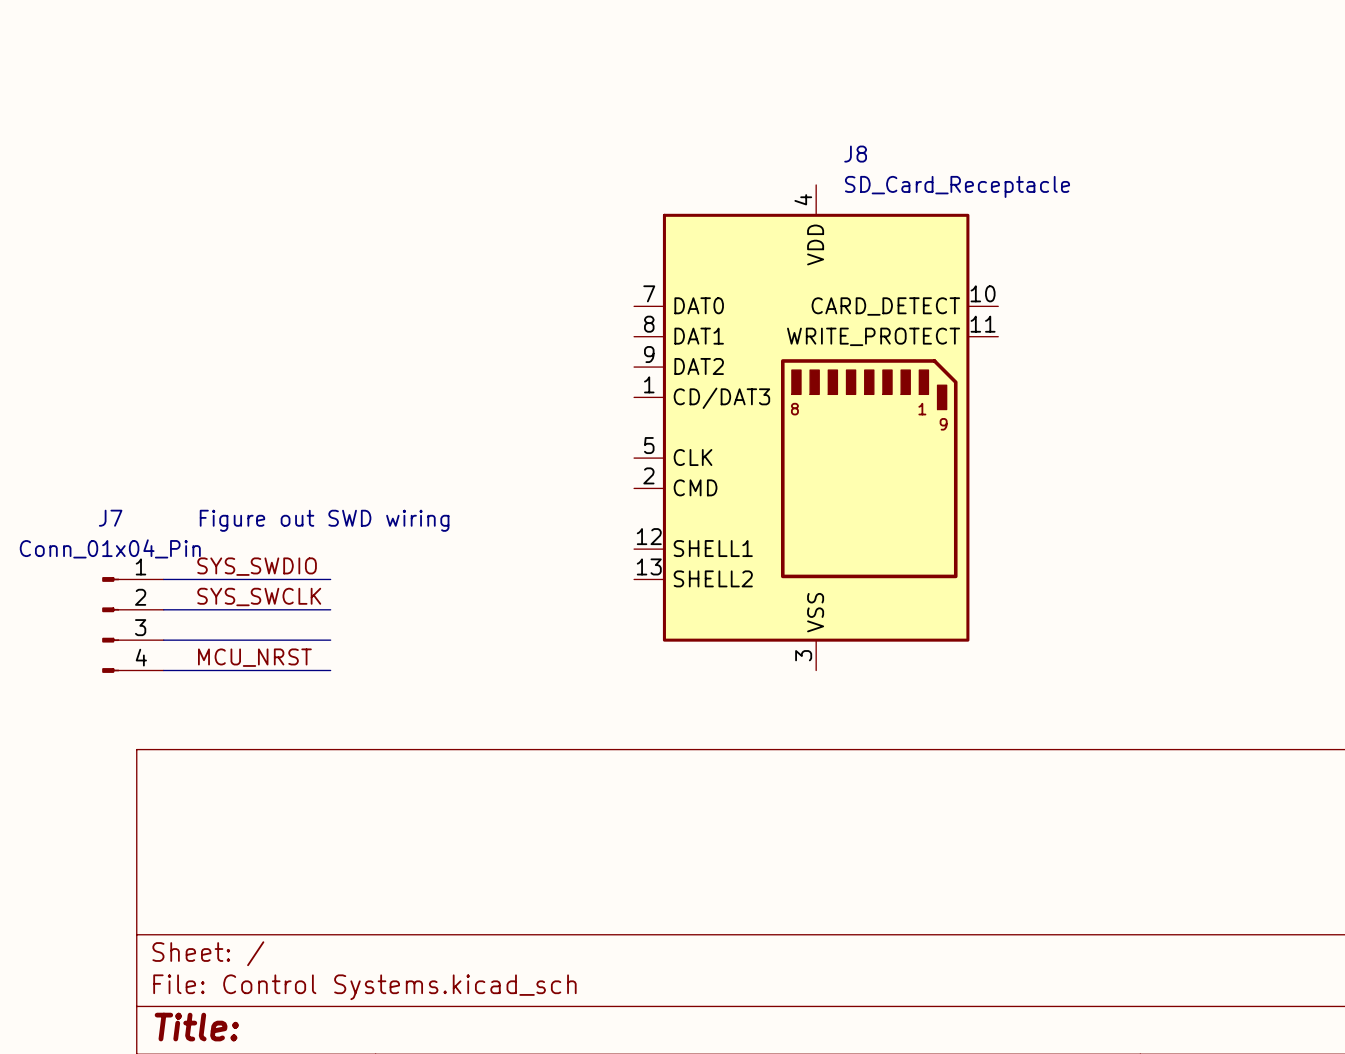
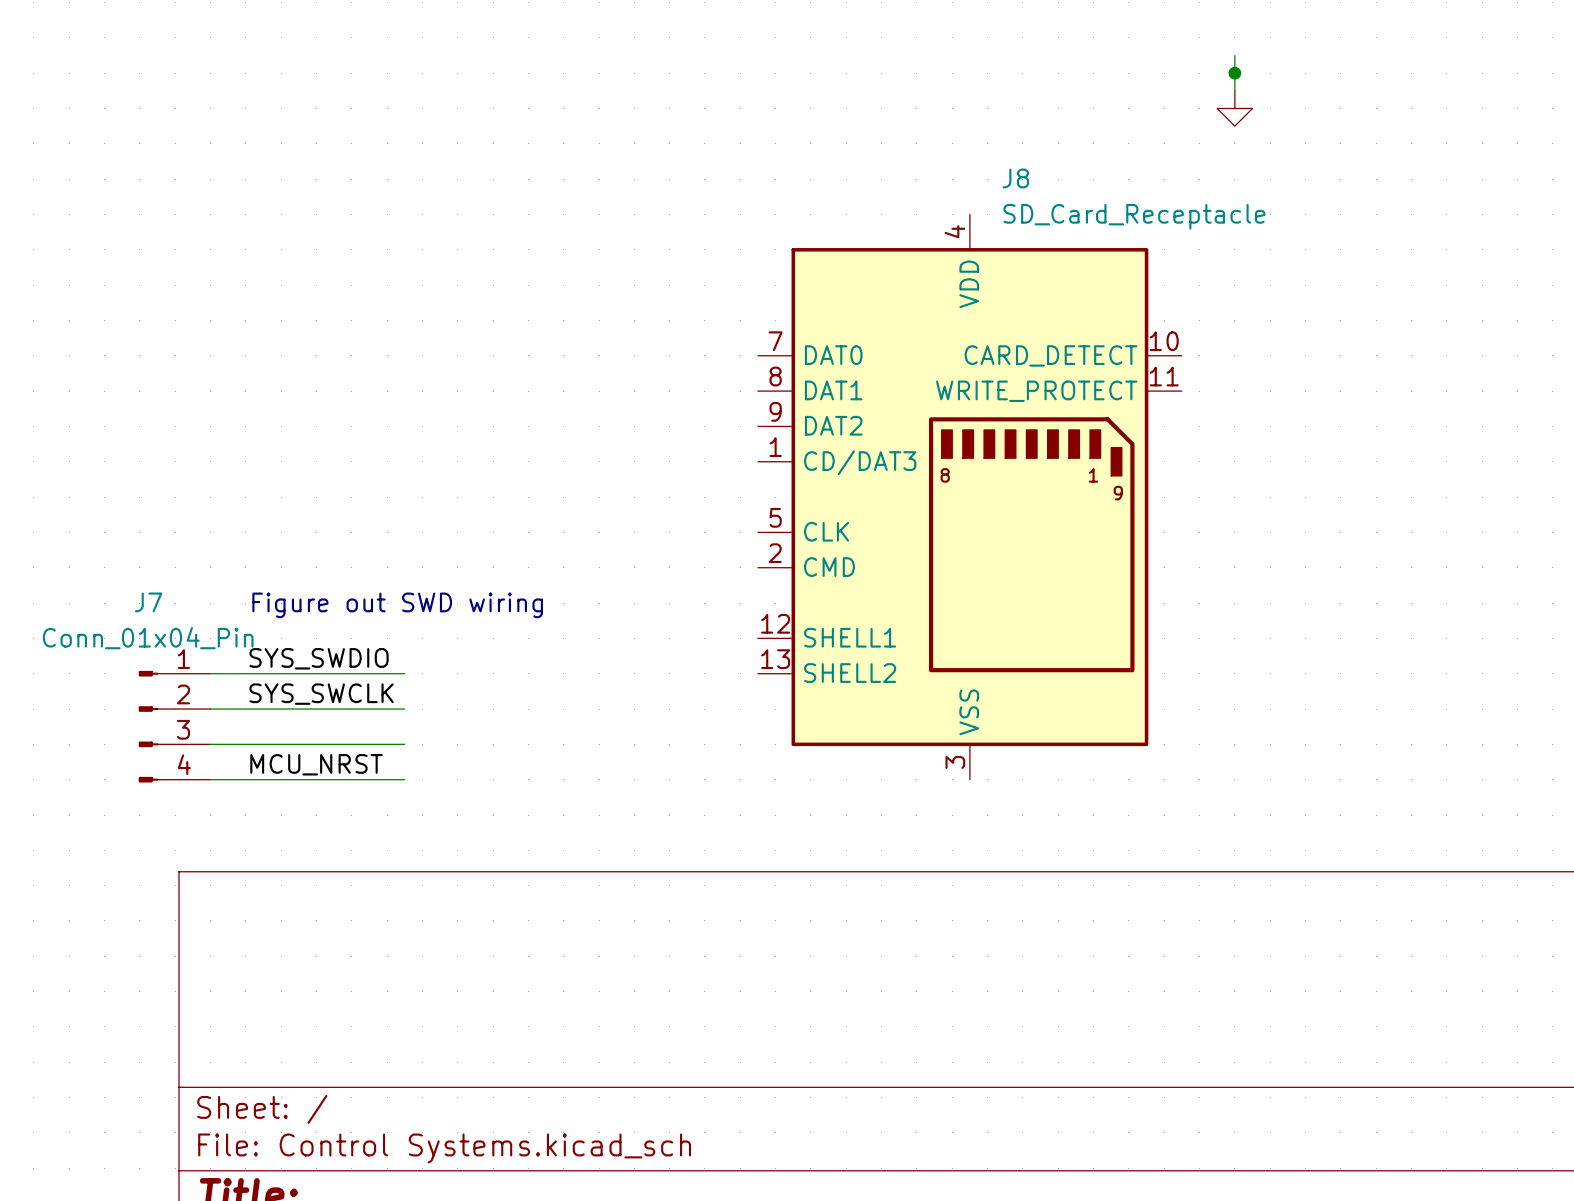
wire: none -> (1234, 55) (1234, 90)
junction: none -> (1234, 73)
power symbol: none -> (1234, 108)

